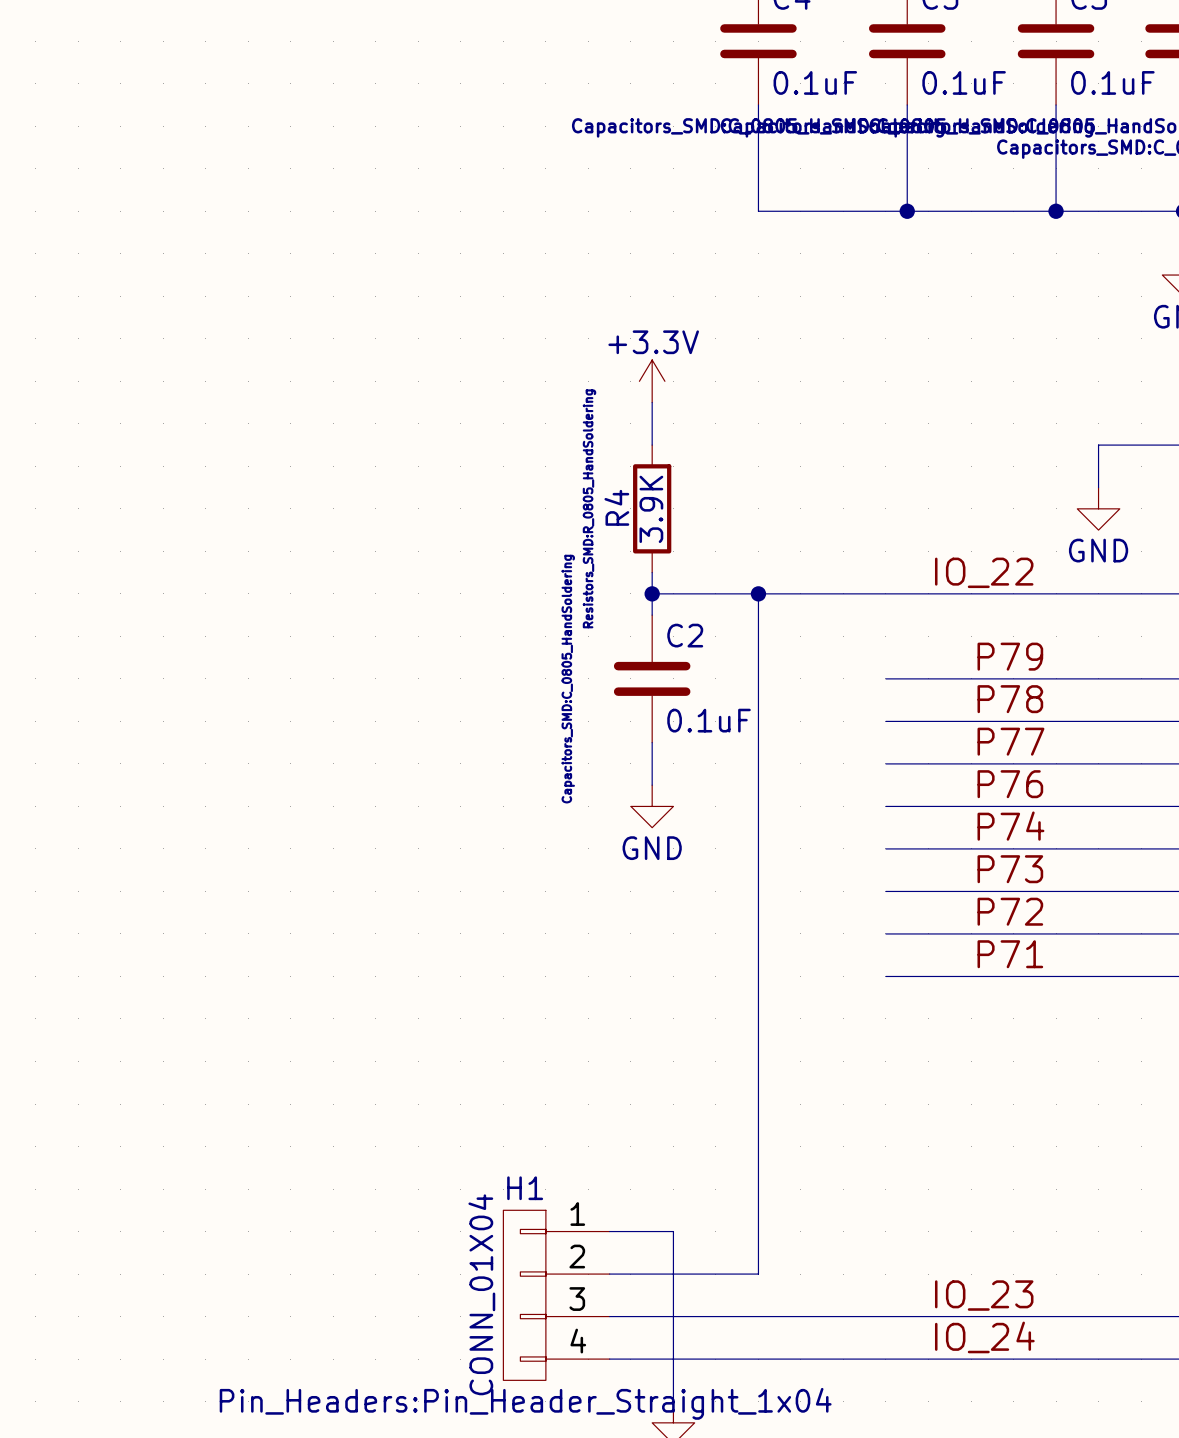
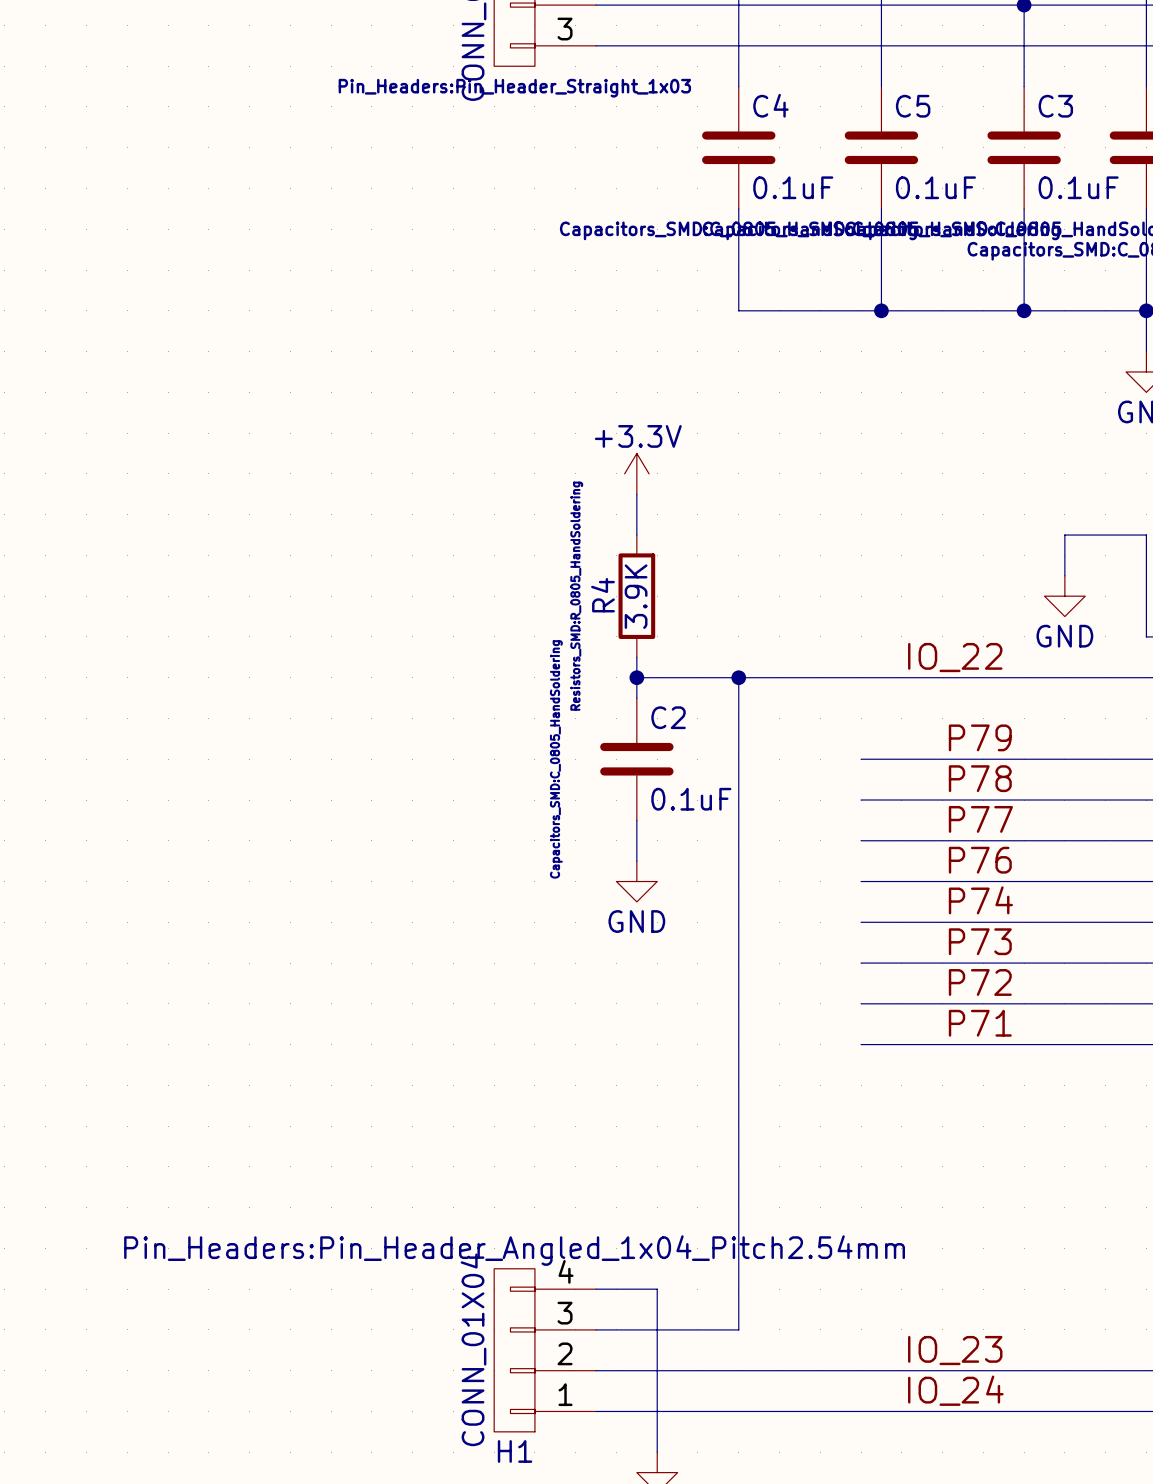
H1 flip: as is (524, 1295) -> up-down (514, 1350)
H1 text: Pin_Headers:Pin_Header_Straight_1x04 (525, 1403) -> Pin_Headers:Pin_Header_Angled_1x04_Pitch2.54mm (514, 1250)

